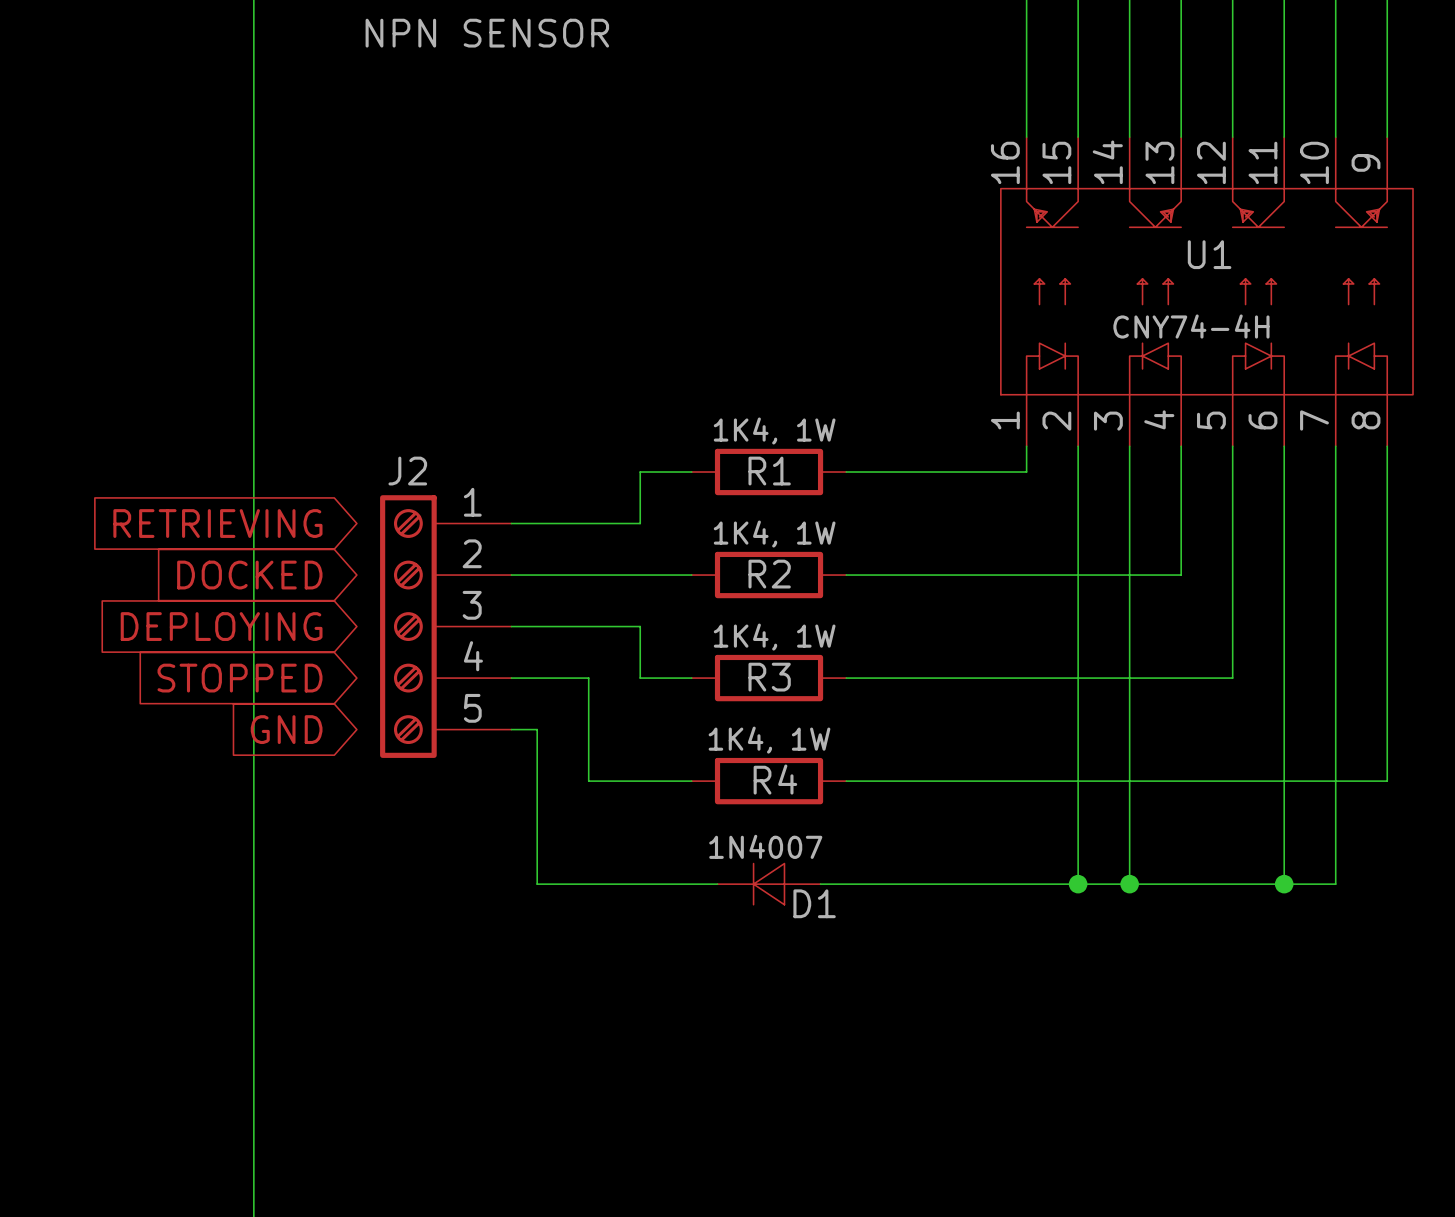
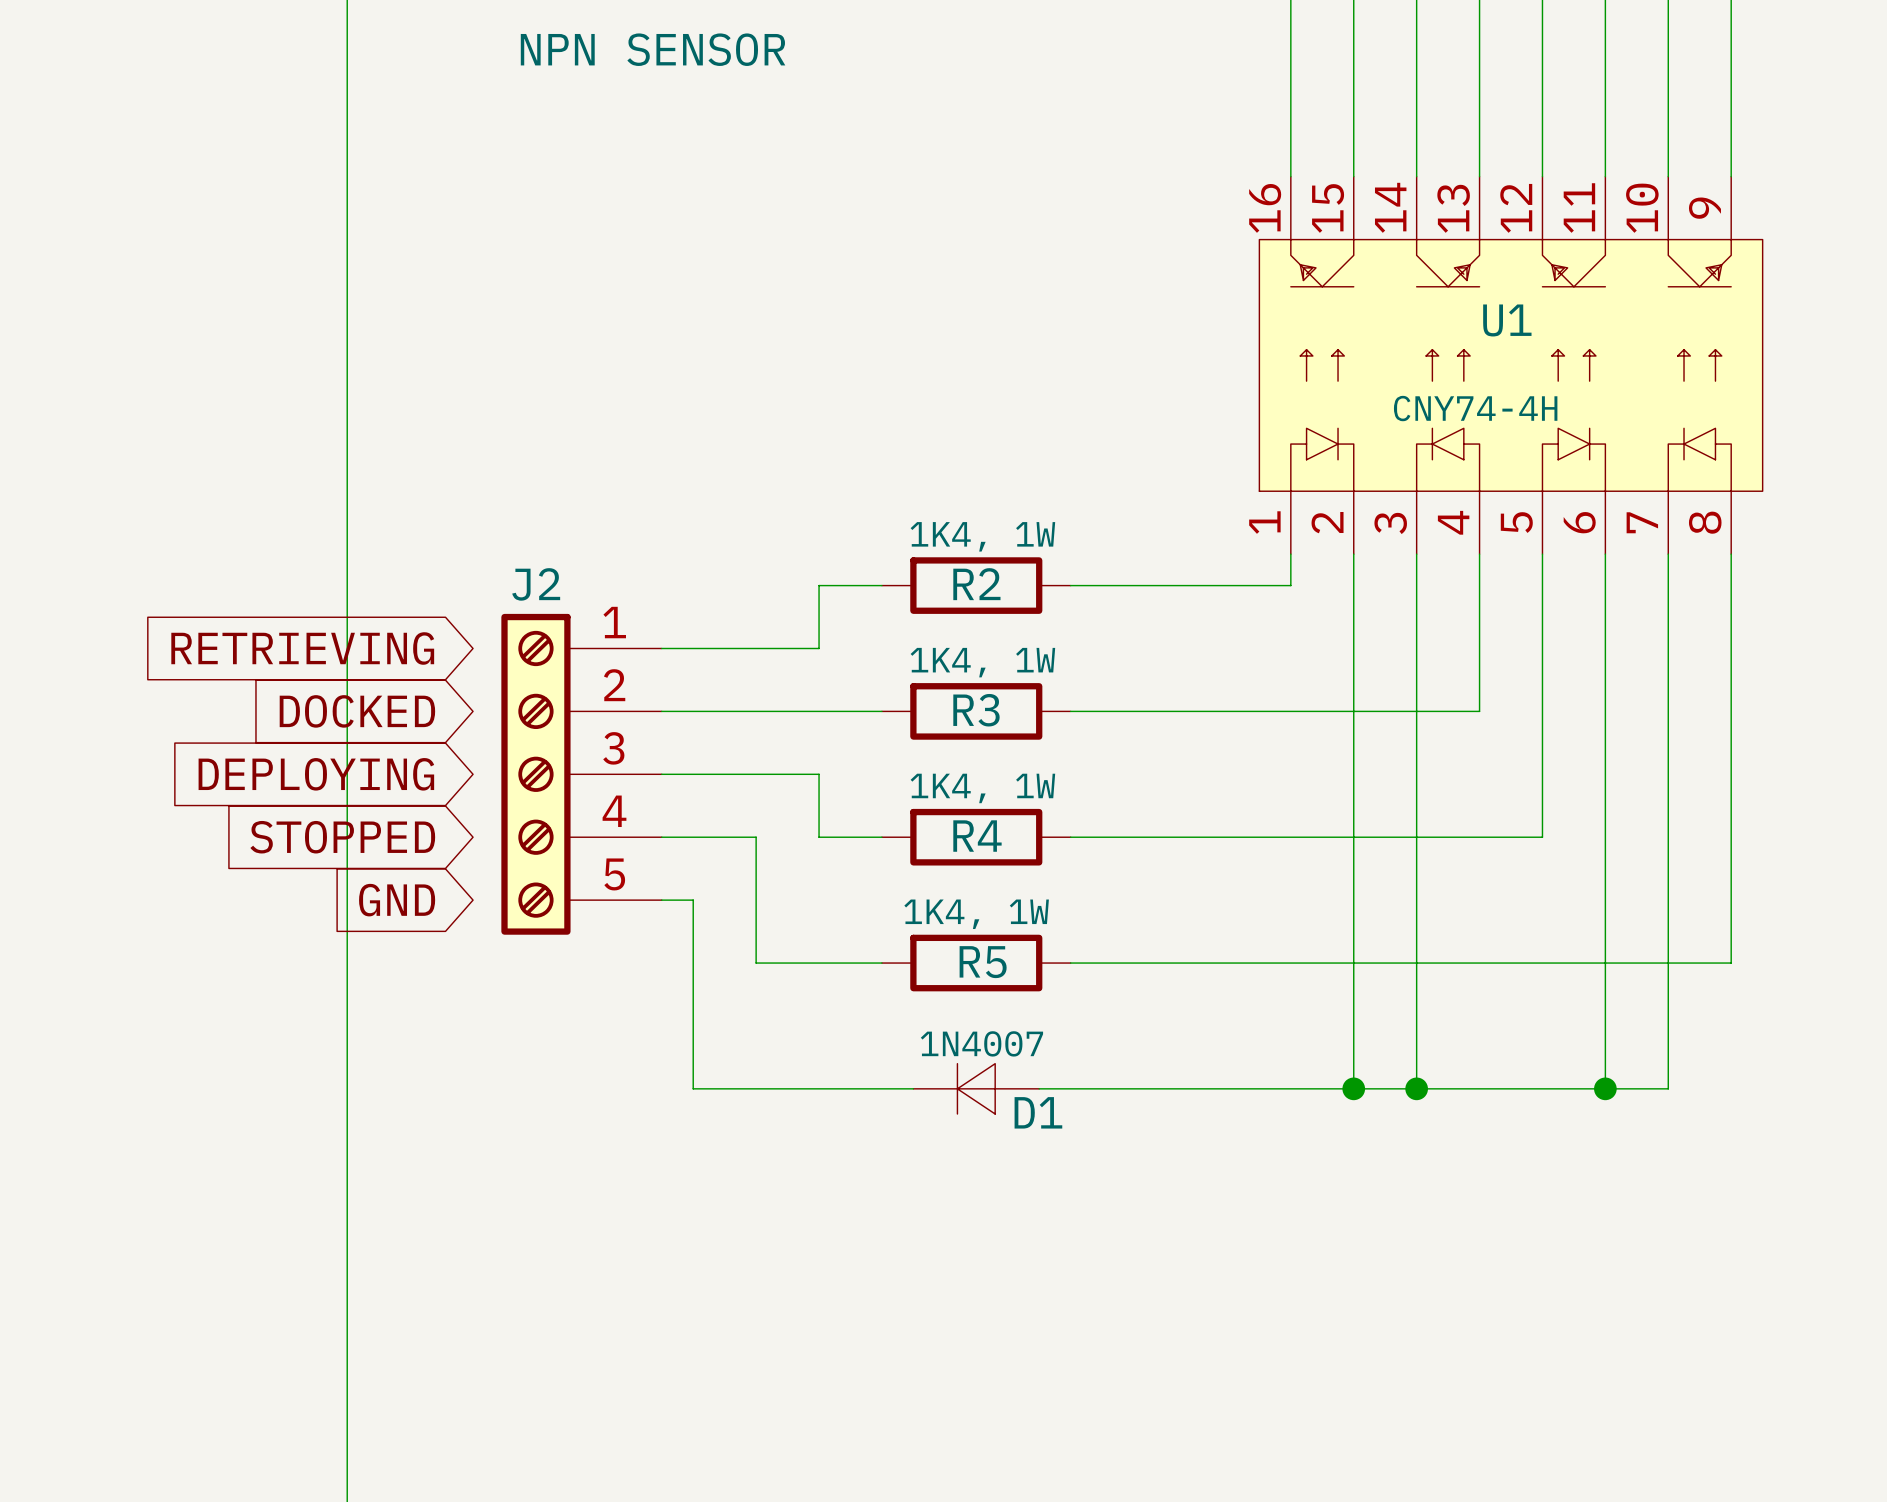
R1 name: R1 (769, 471) -> R2 (976, 584)
R2 name: R2 (769, 574) -> R3 (976, 710)
R3 name: R3 (769, 677) -> R4 (977, 836)
R4 name: R4 (775, 779) -> R5 (983, 962)

